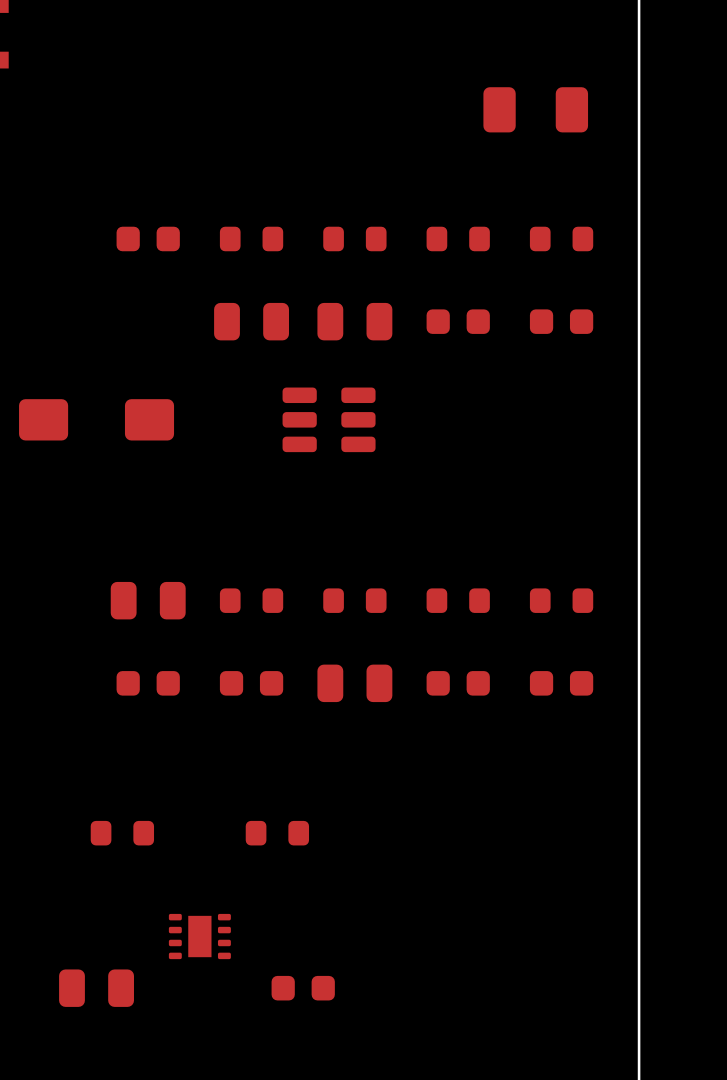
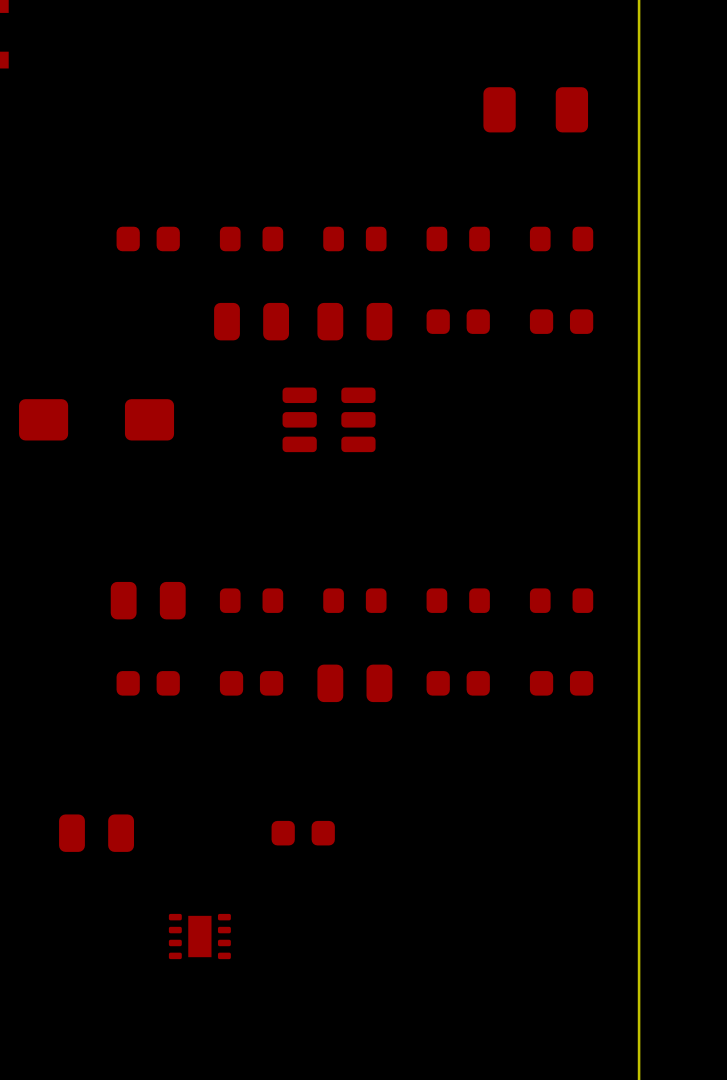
part footprint: [90, 820, 155, 846] -> [59, 814, 135, 852]
part footprint: [245, 820, 310, 846] -> [271, 820, 335, 846]
part: (96, 988) -> none
part: (303, 988) -> none

